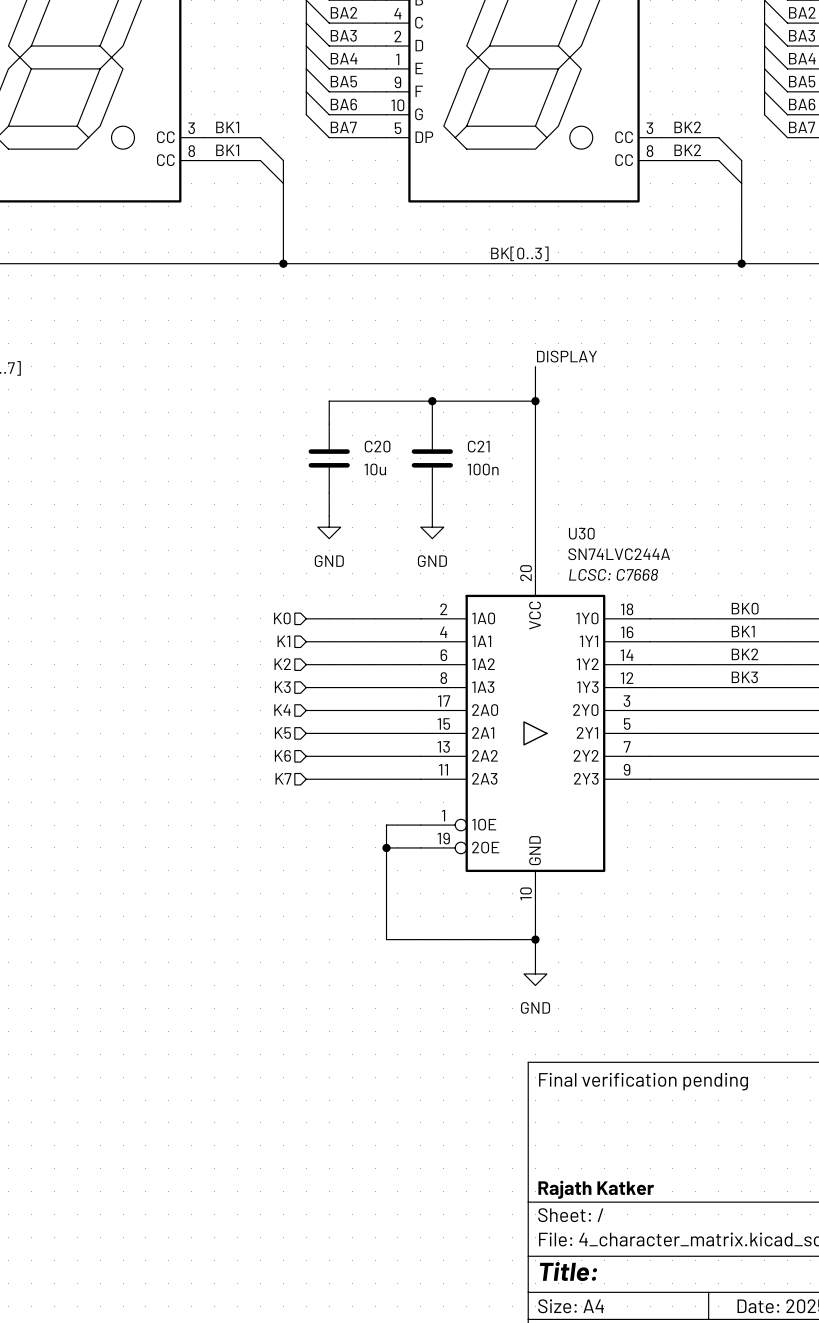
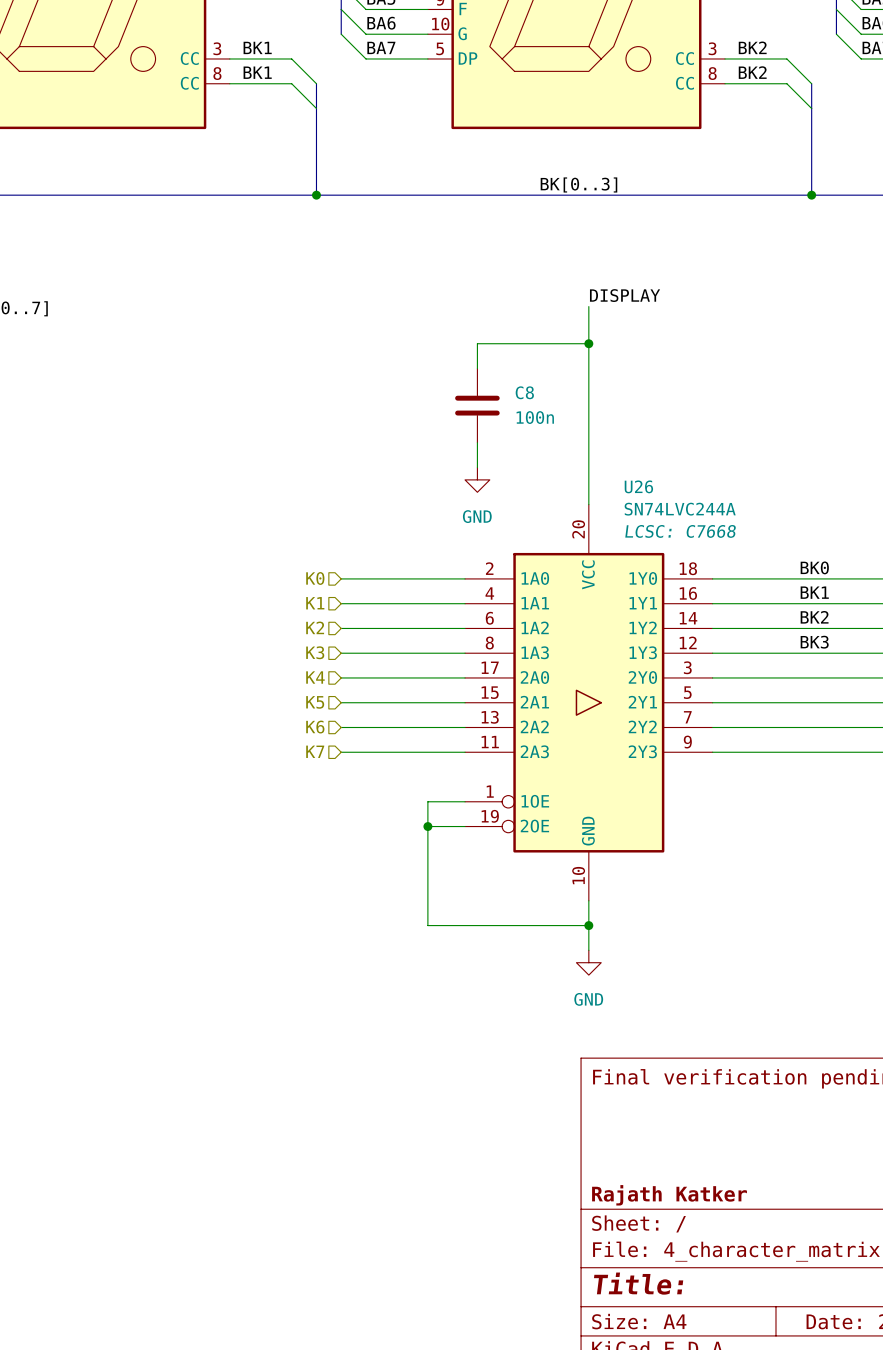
wire: (432, 401) (329, 401) (329, 424) -> none
junction: (432, 401) -> none
C21 name: C21 (478, 446) -> C8 (524, 392)
C20: 10u (329, 458) -> none
wire: (329, 492) (329, 515) -> none
power symbol: GND (329, 527) -> none
U30 name: U30 (581, 533) -> U26 (638, 486)

